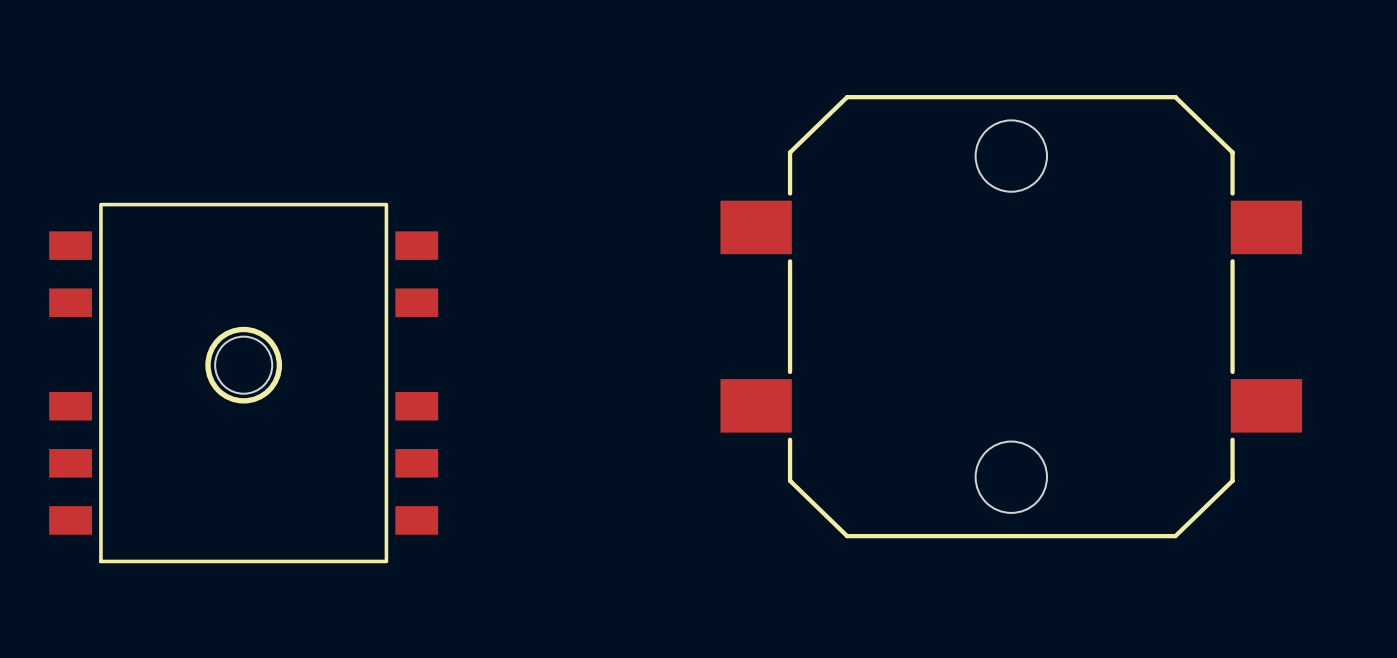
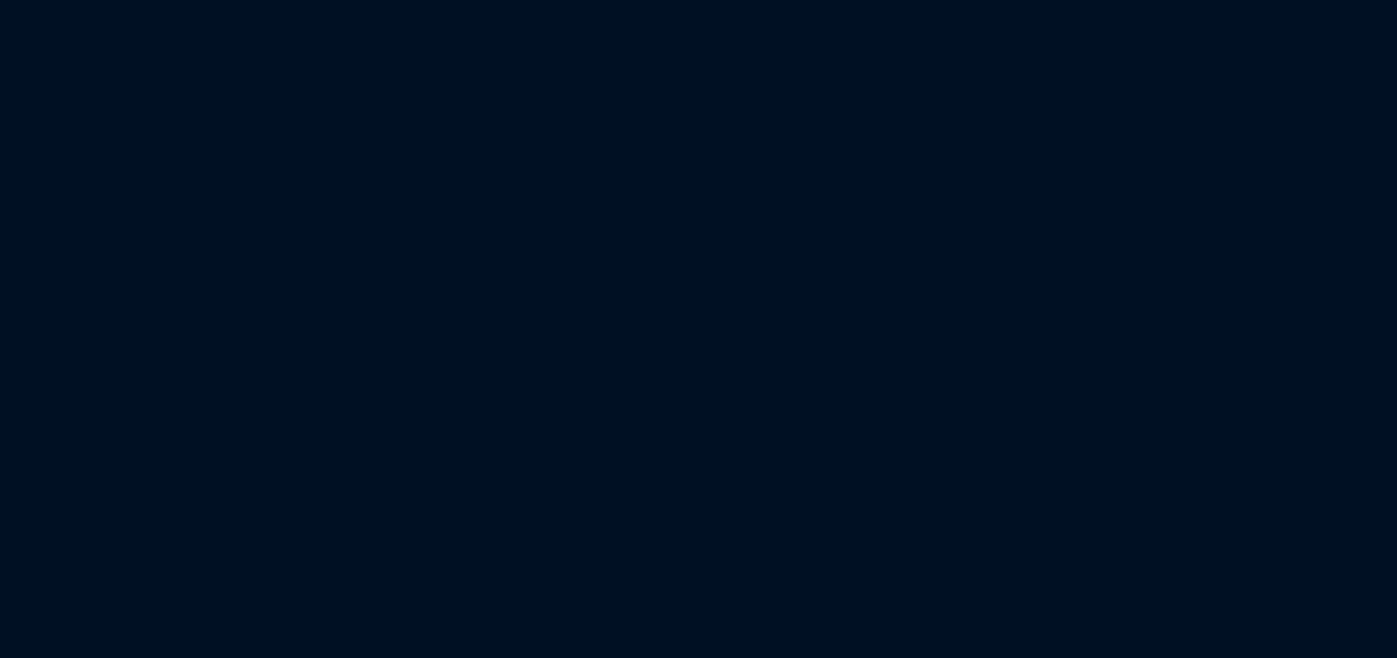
part: (1011, 316) -> none
part: (243, 383) -> none

